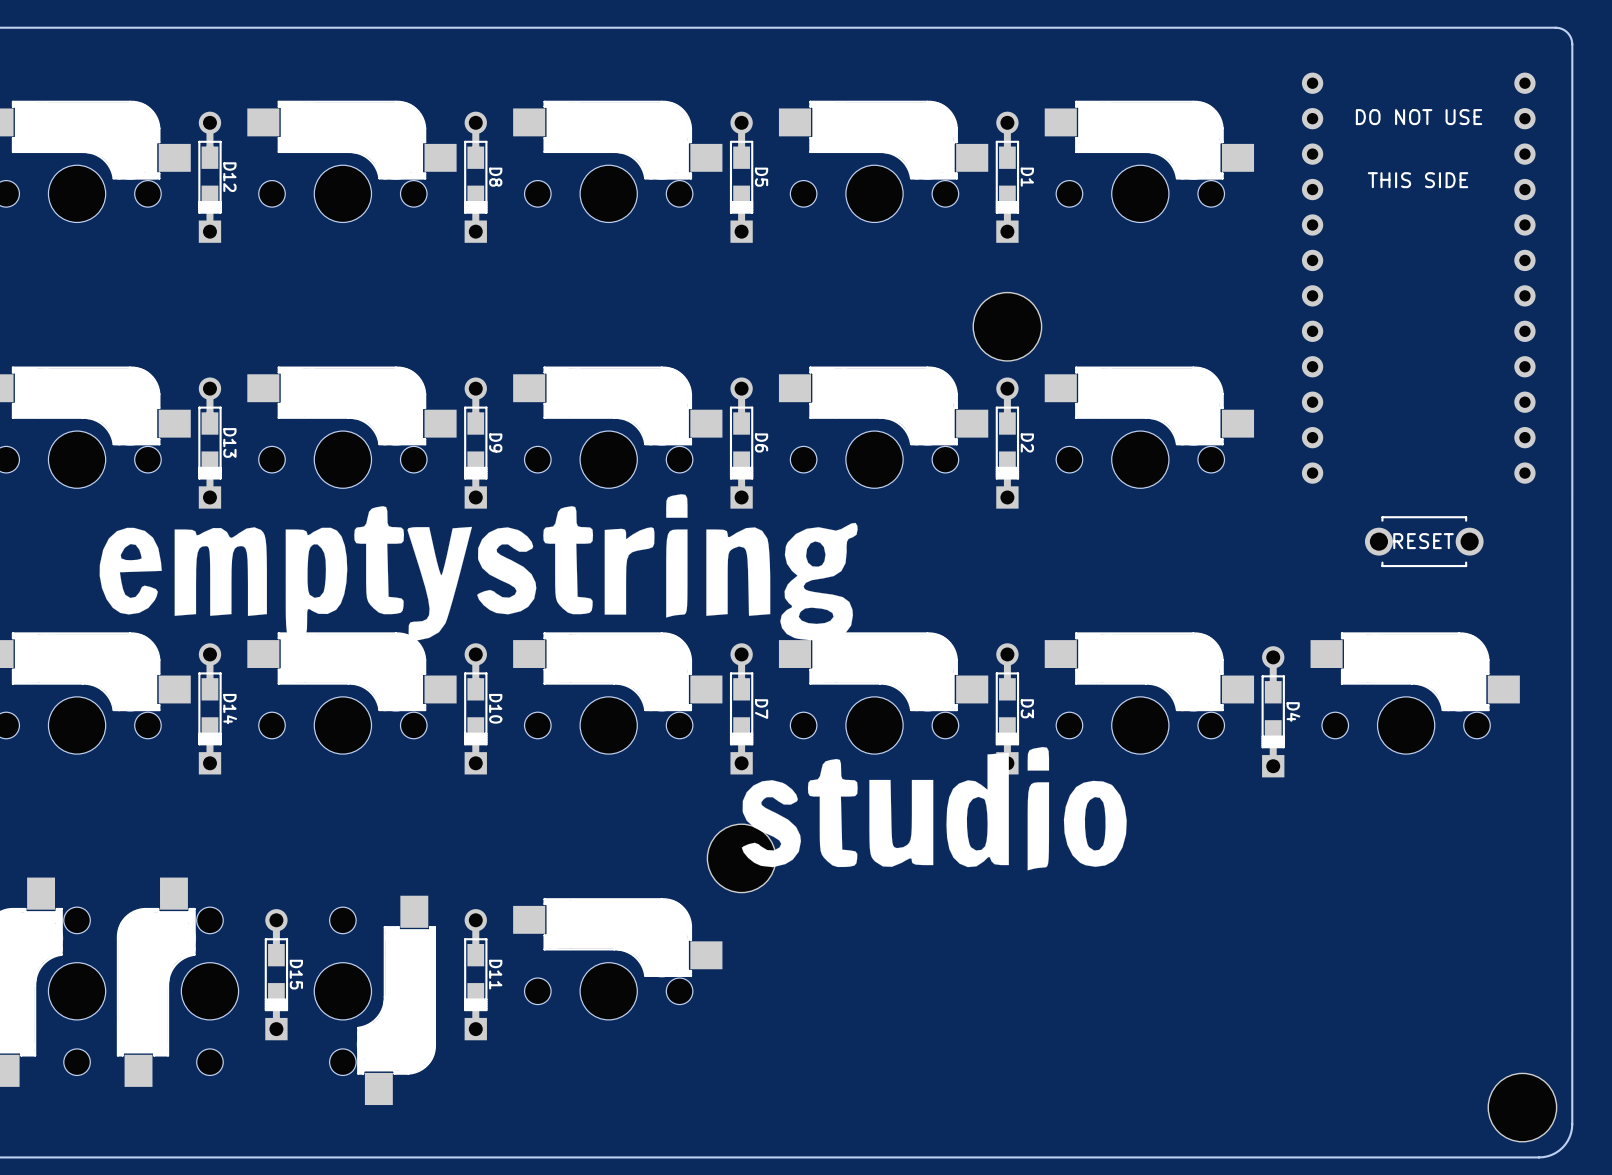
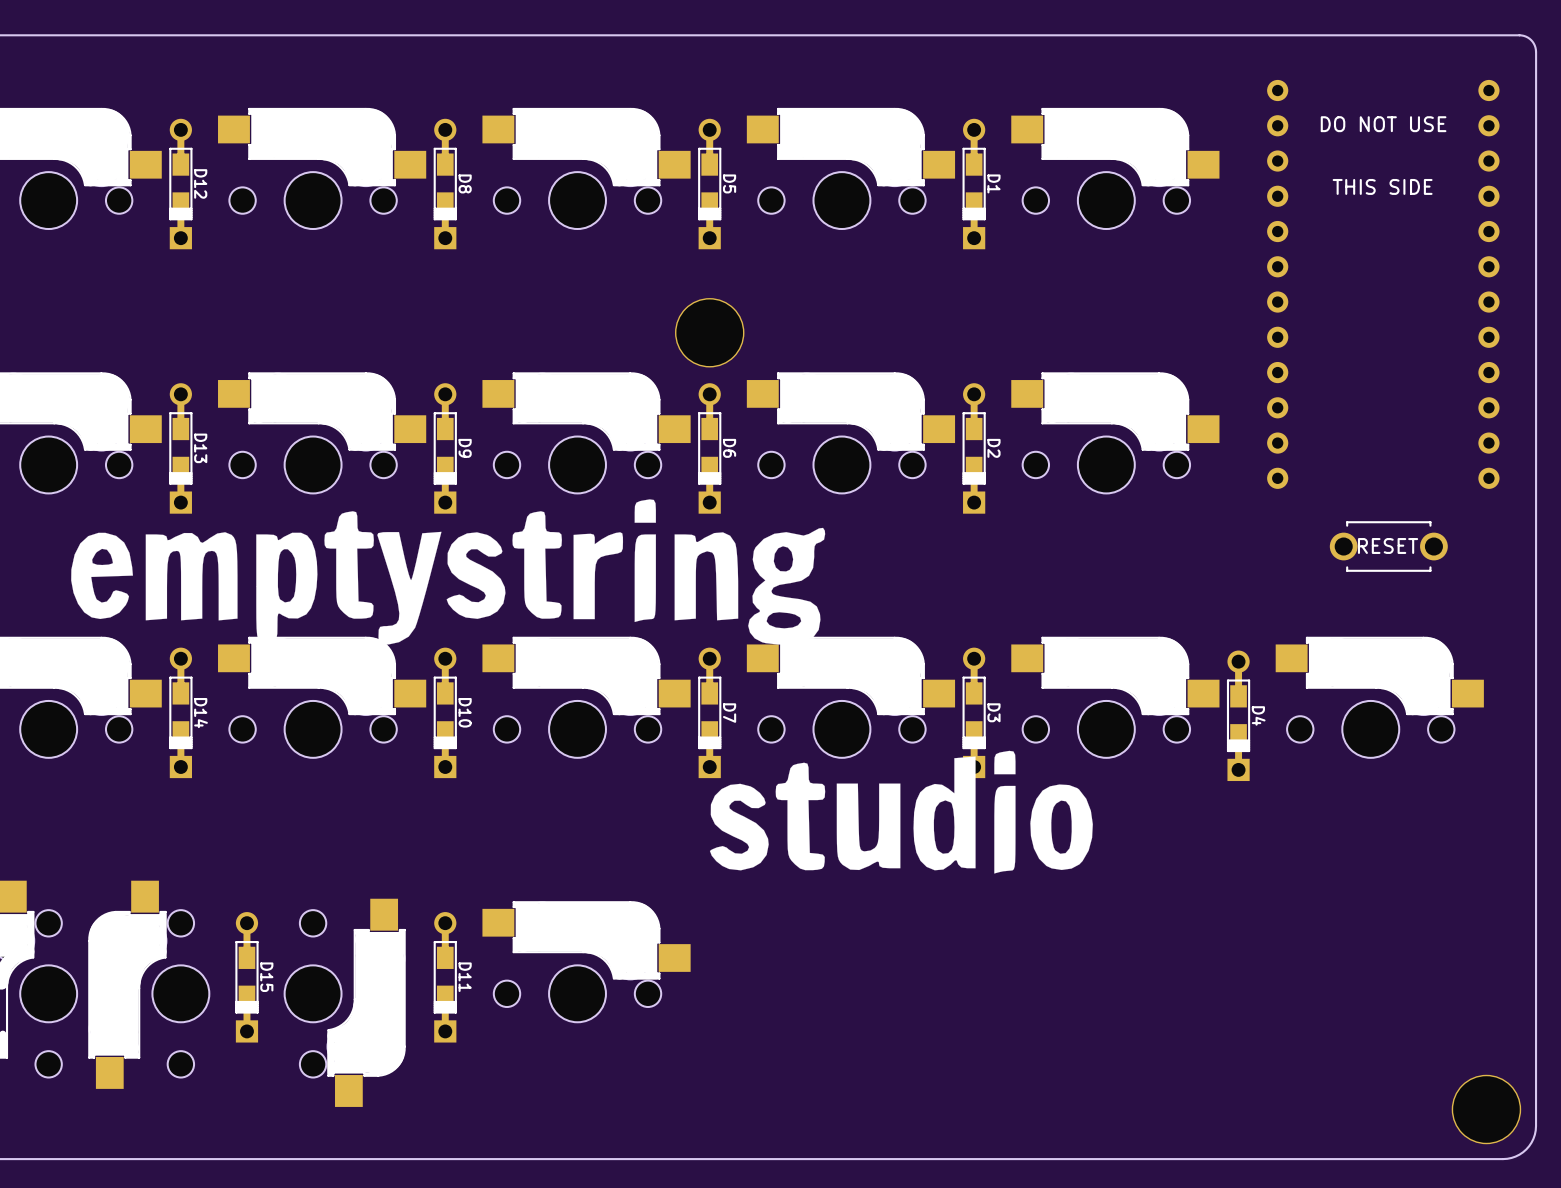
part: none -> (709, 332)
part: (1007, 326) -> none
part: (741, 858) -> none

